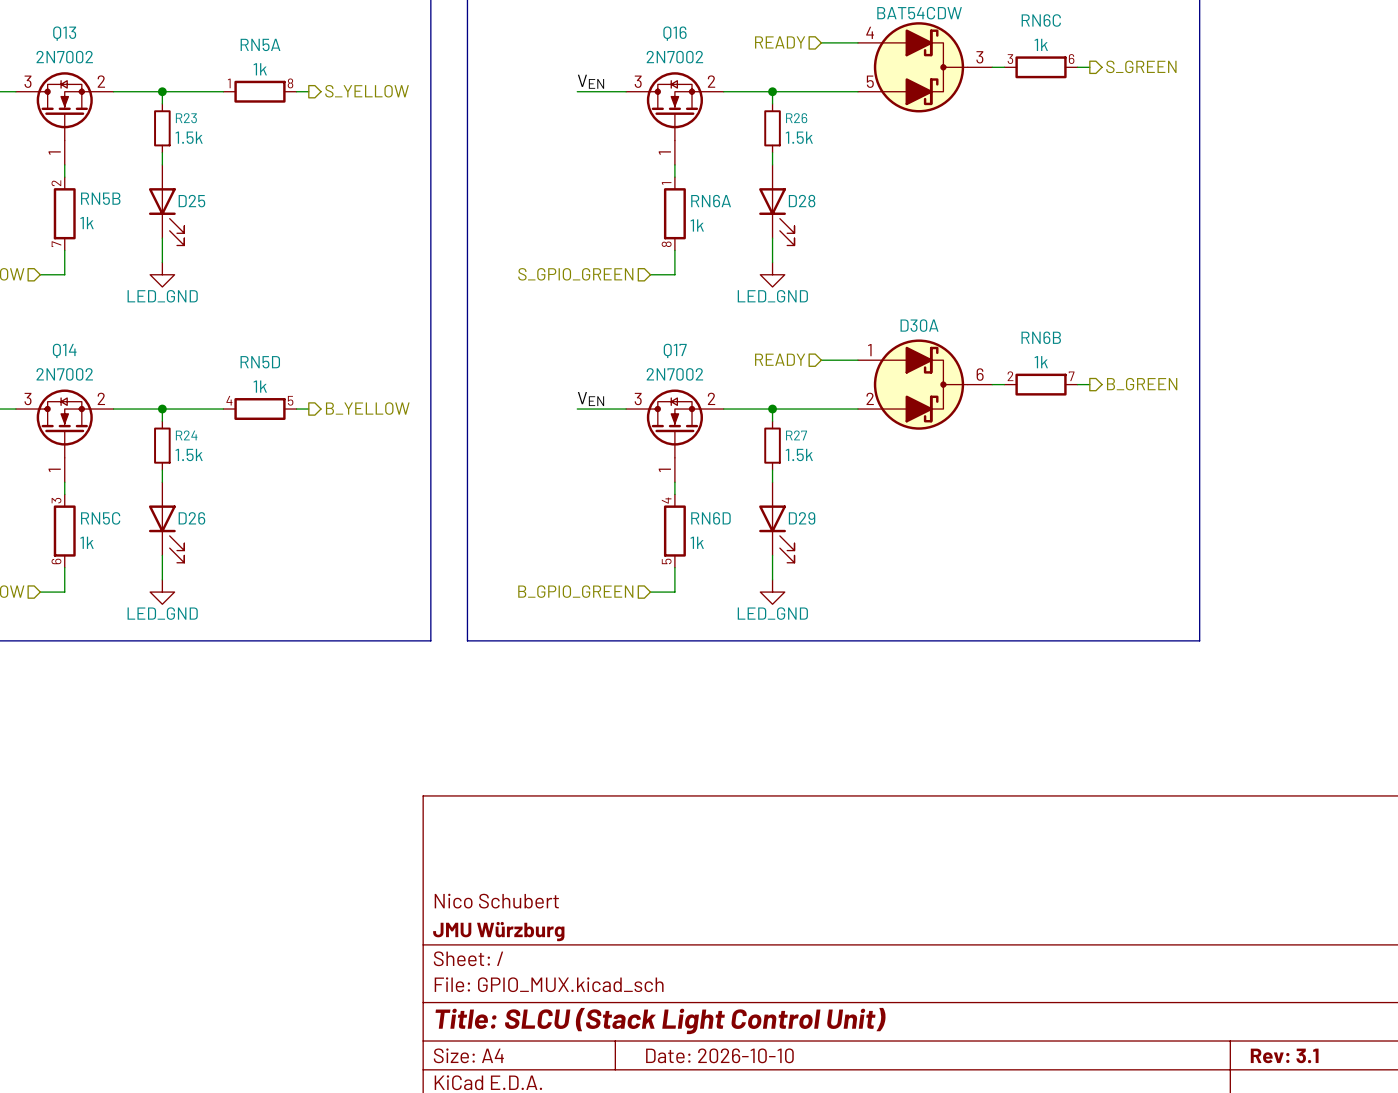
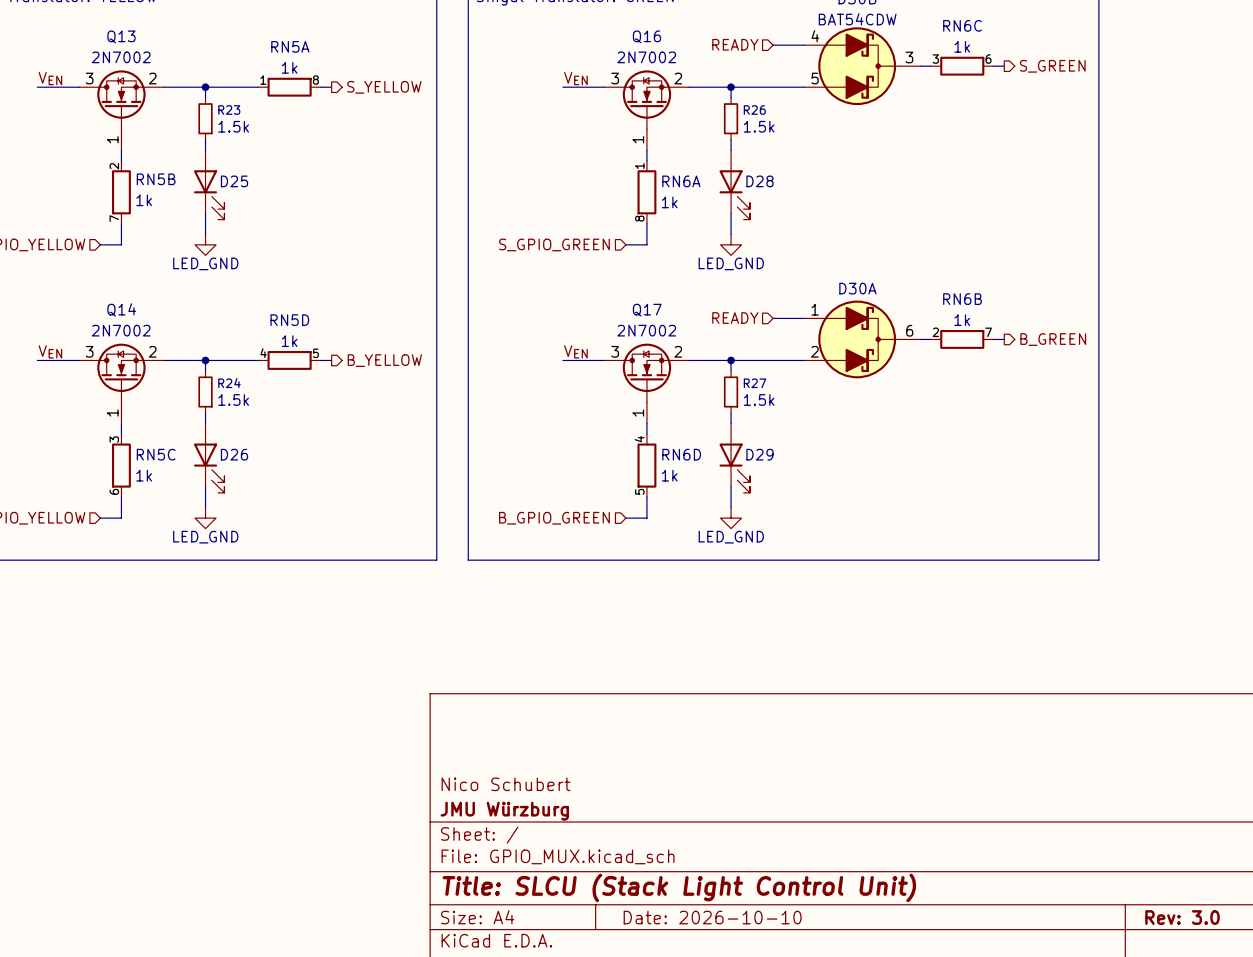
title block: Rev: 3.1 (1284, 1055) -> Rev: 3.0 (1182, 917)

